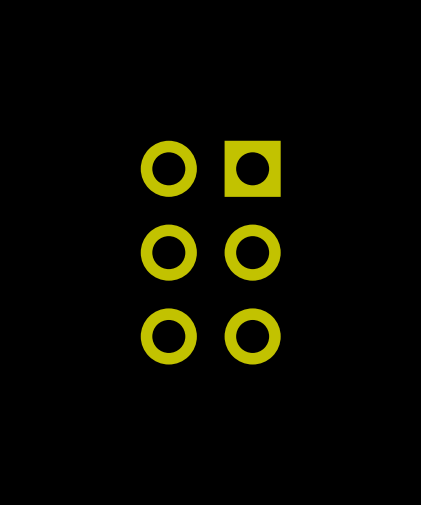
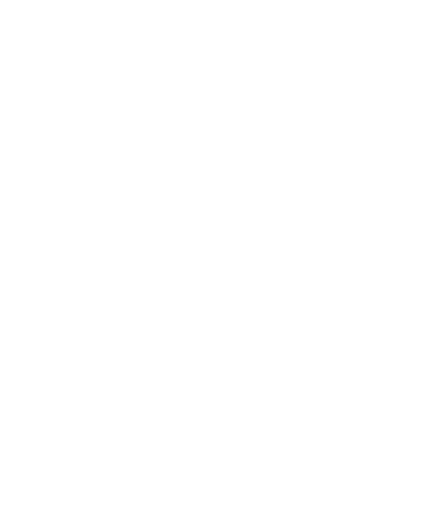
part: (210, 252) -> none

